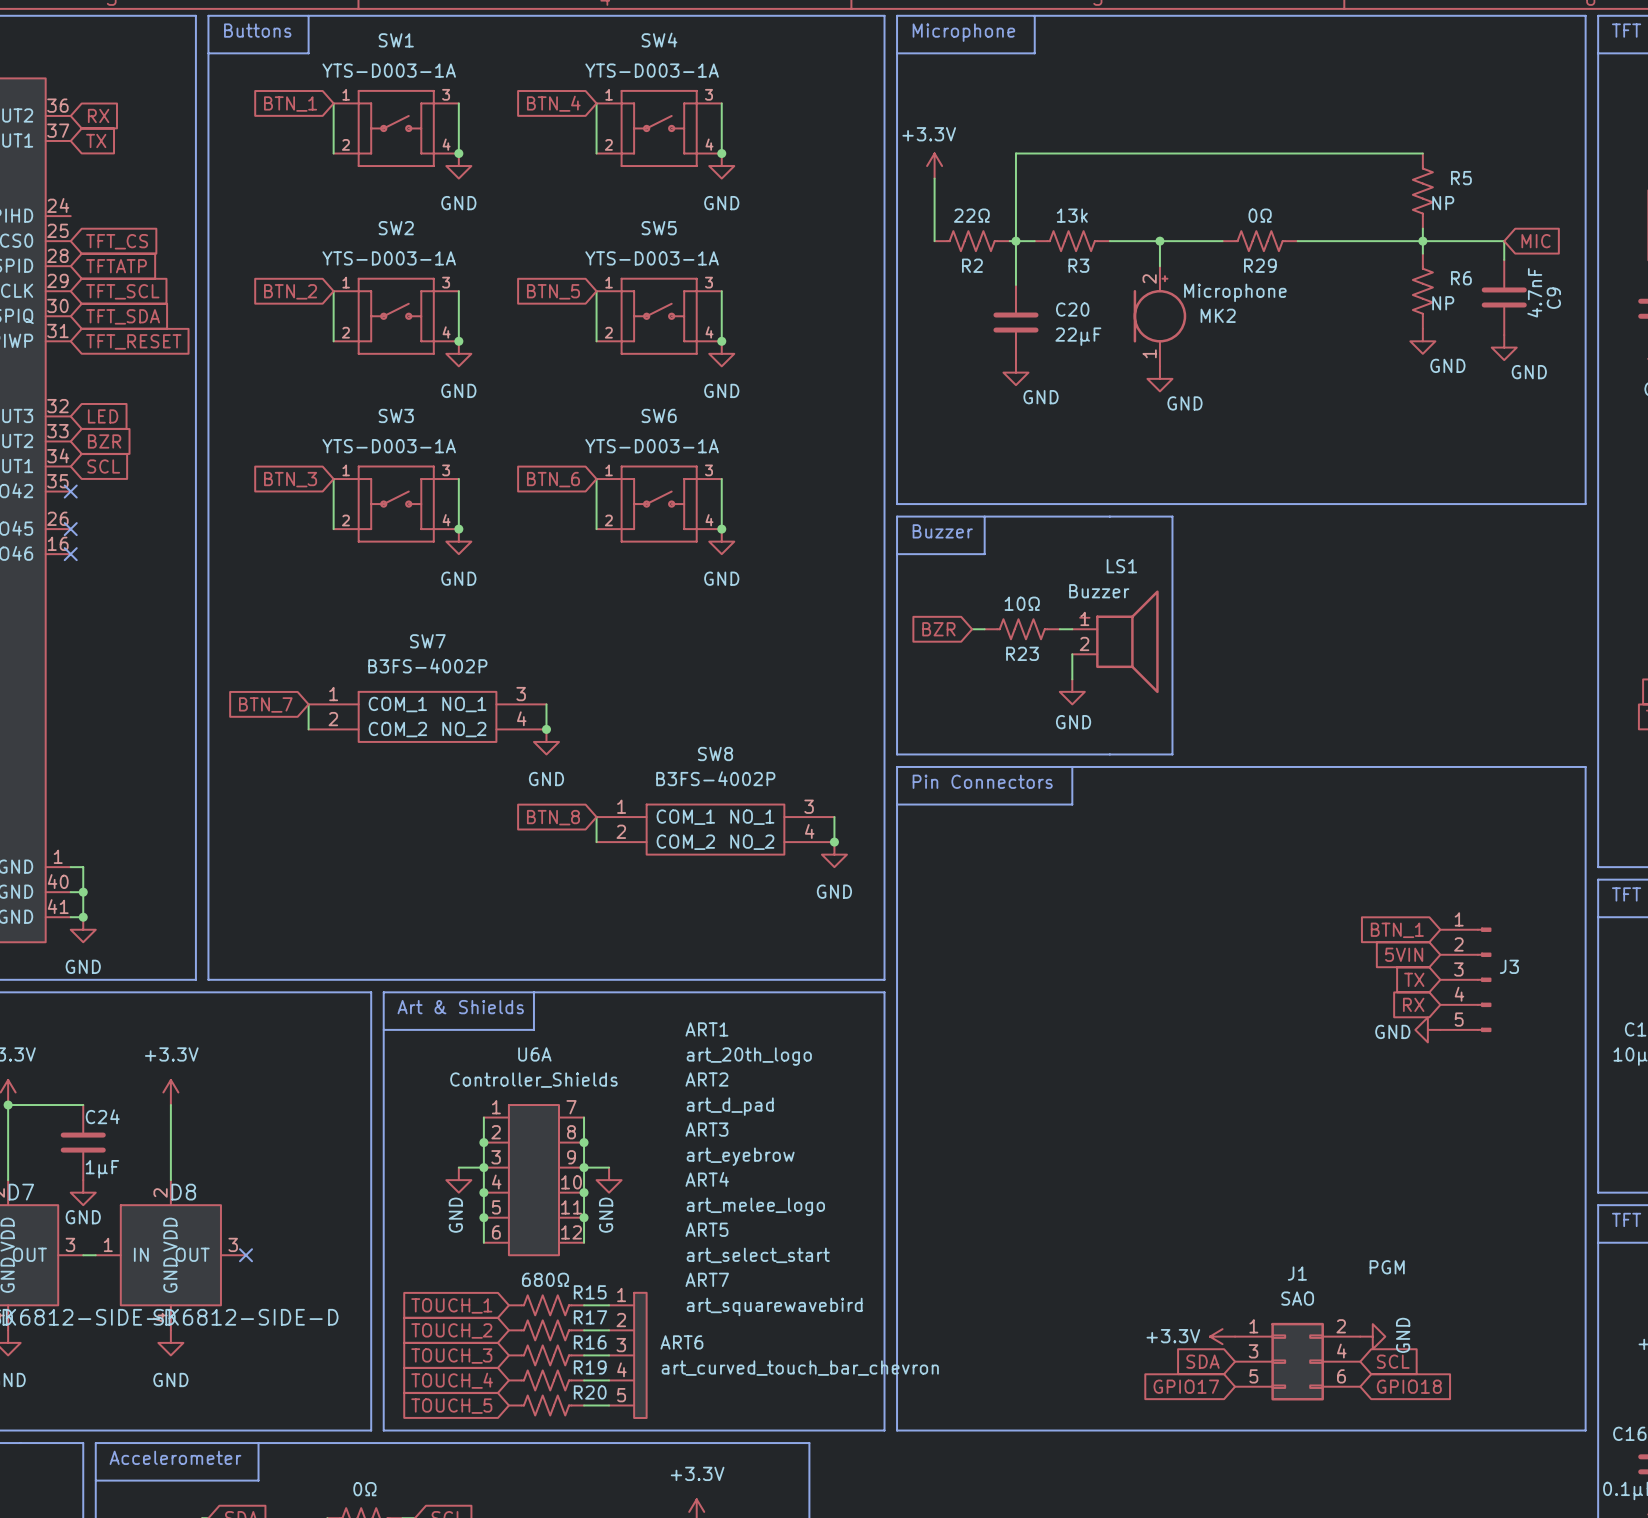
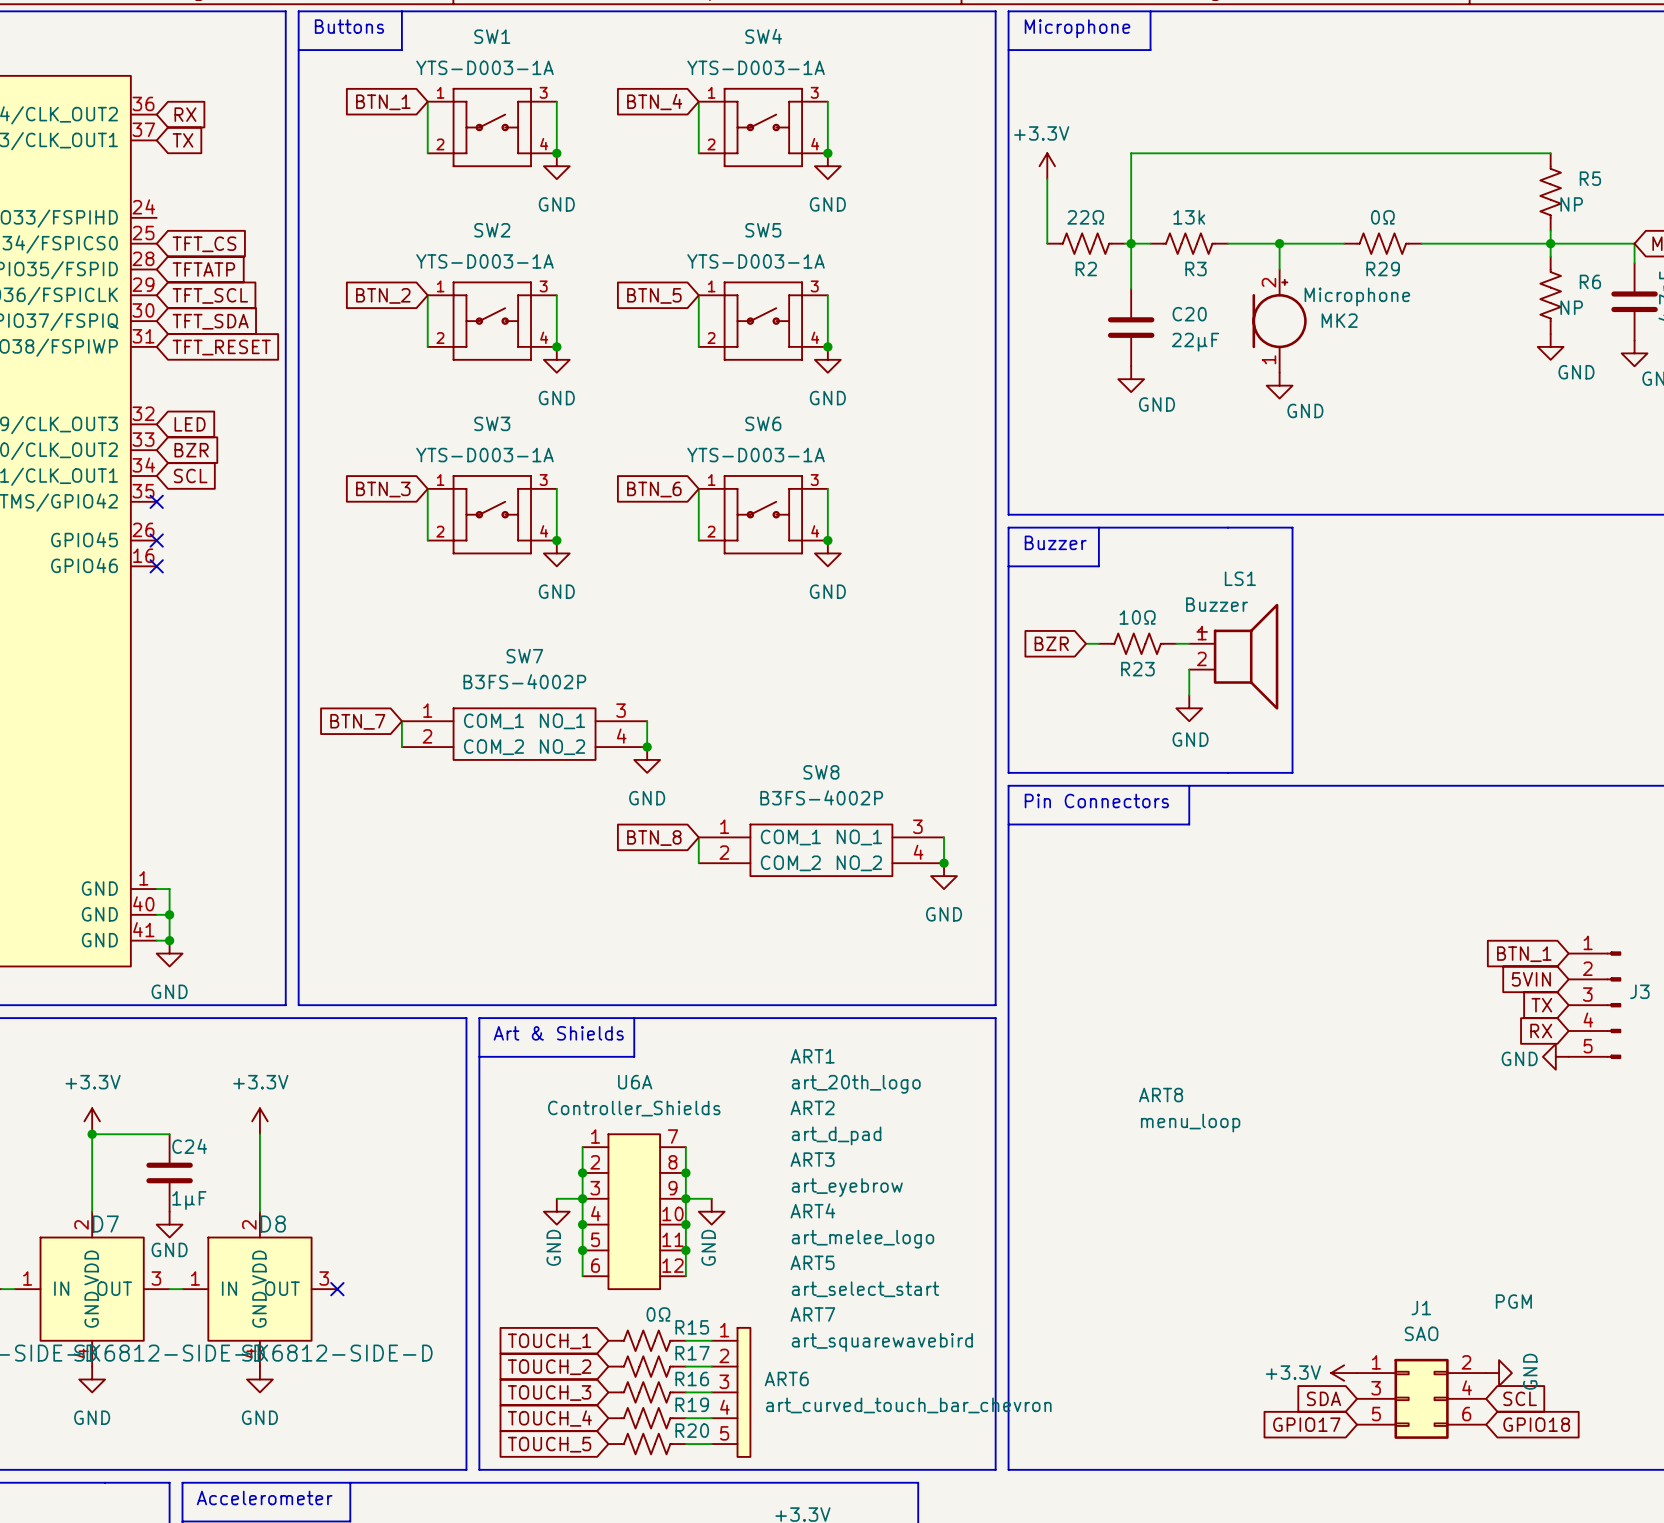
ART8: none -> menu_loop (1189, 1110)
R15 value: 680Ω (545, 1279) -> 0Ω (658, 1314)

